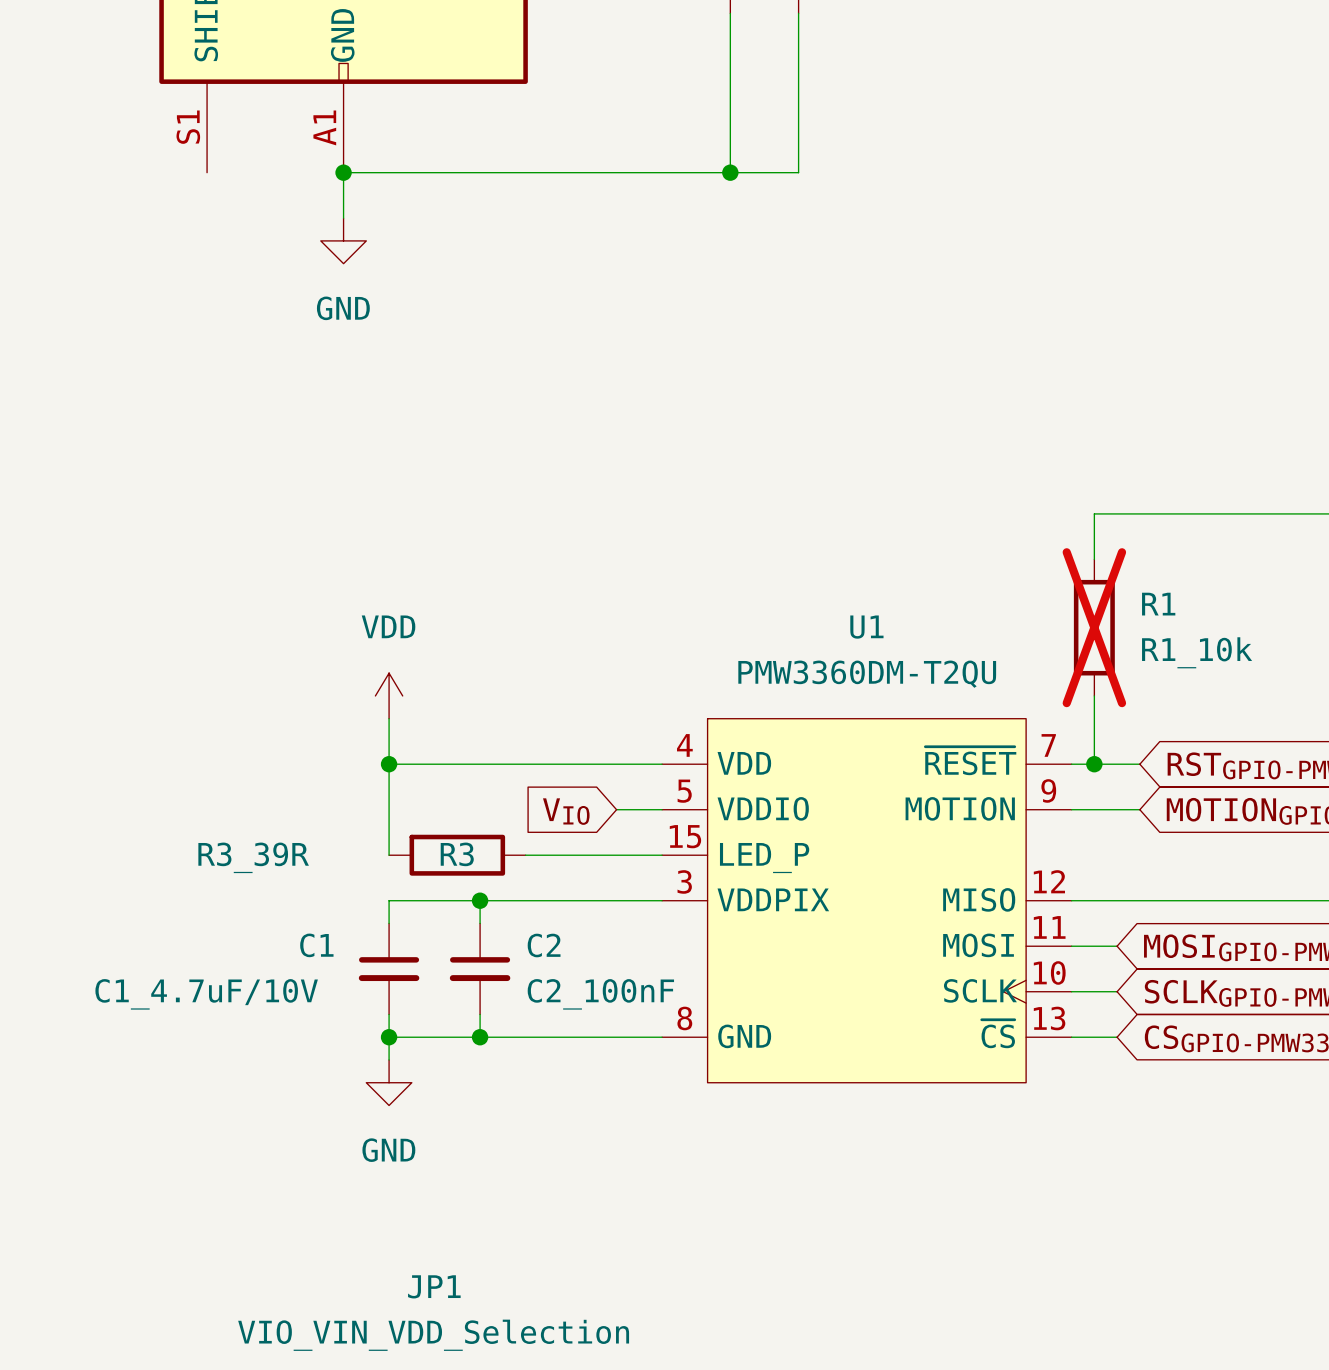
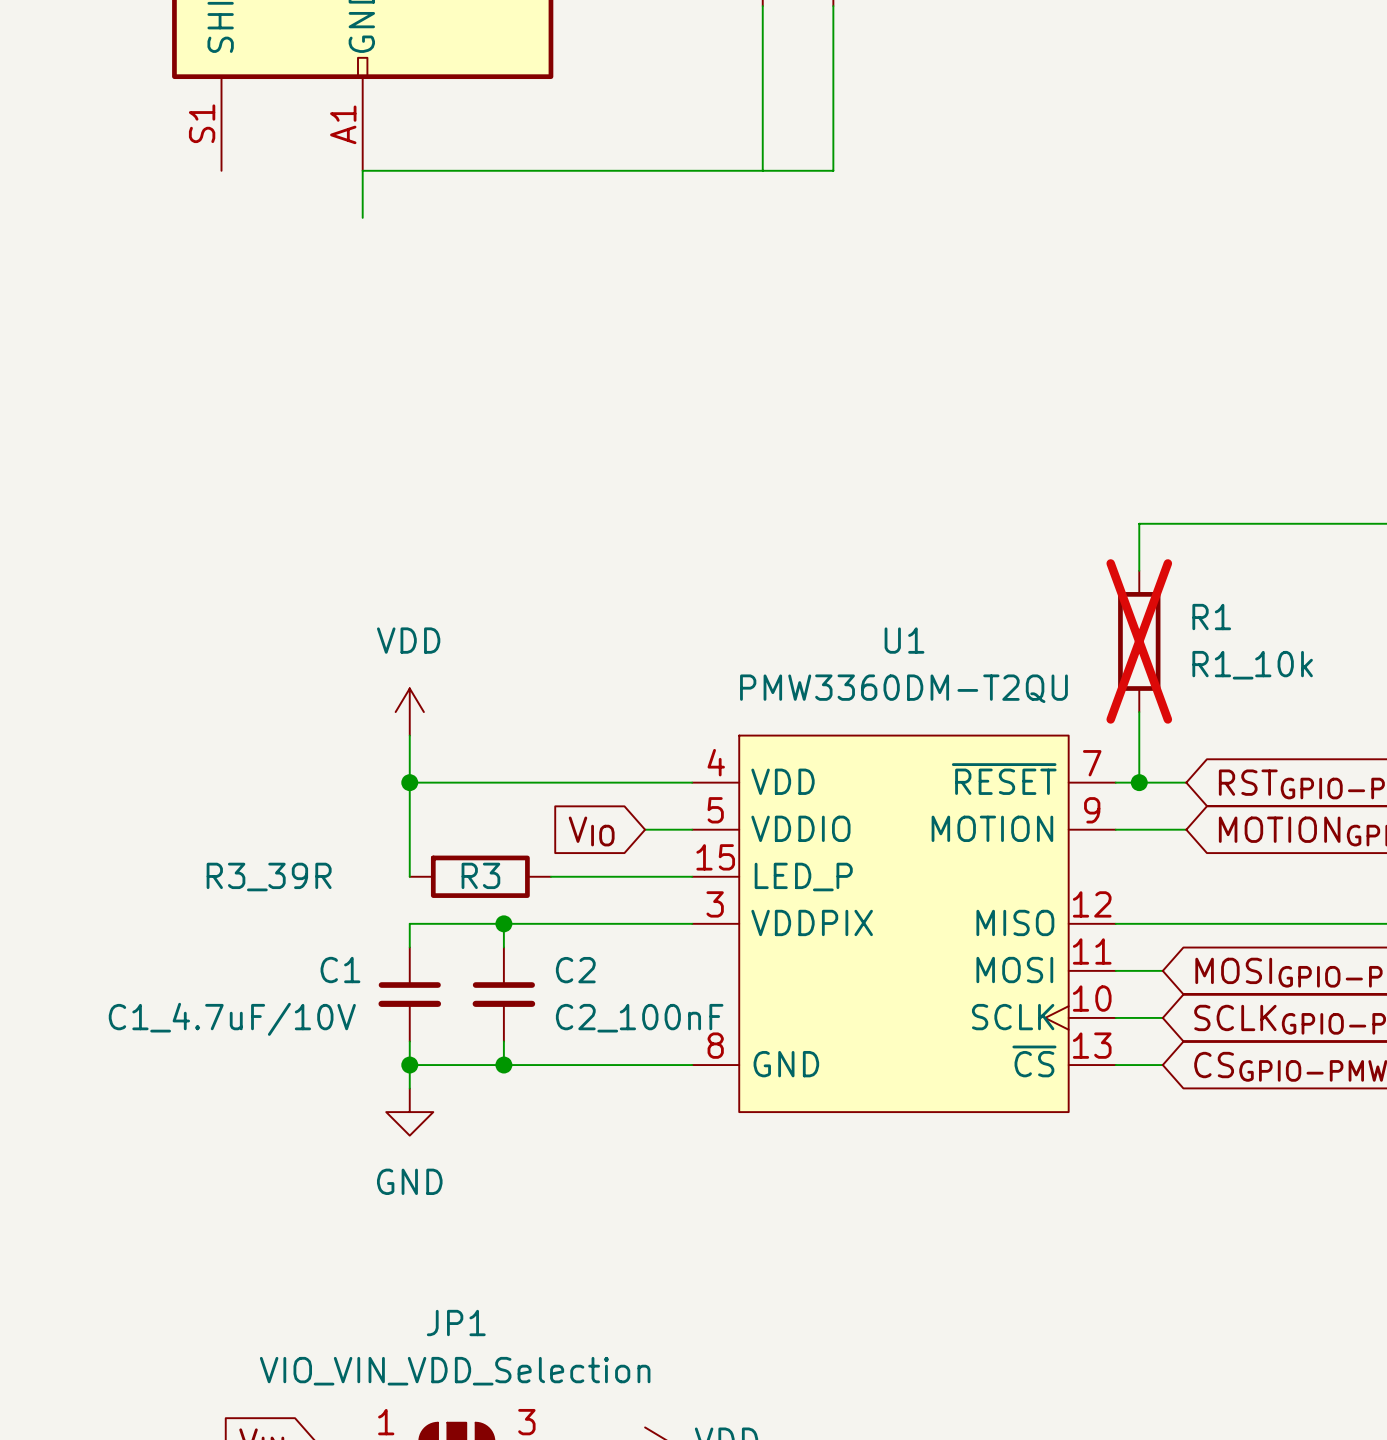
junction: (343, 172) -> none
junction: (730, 172) -> none
power symbol: GND (343, 240) -> none

